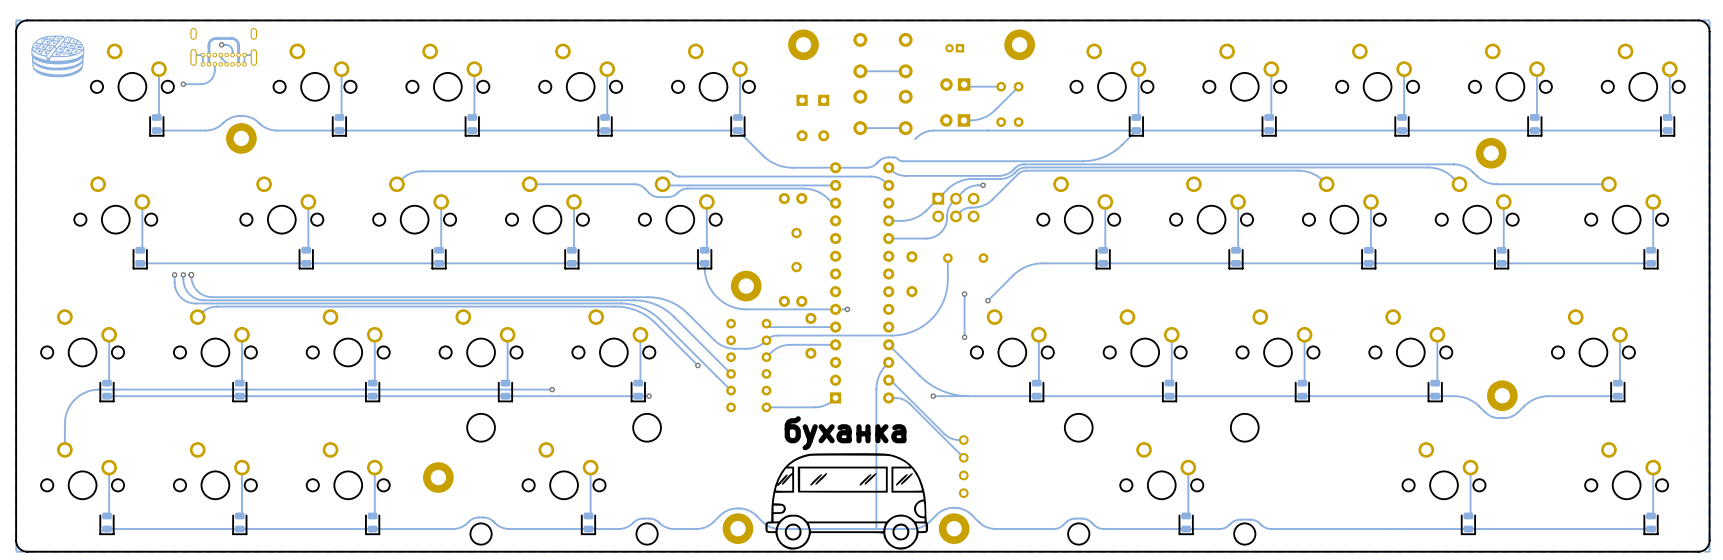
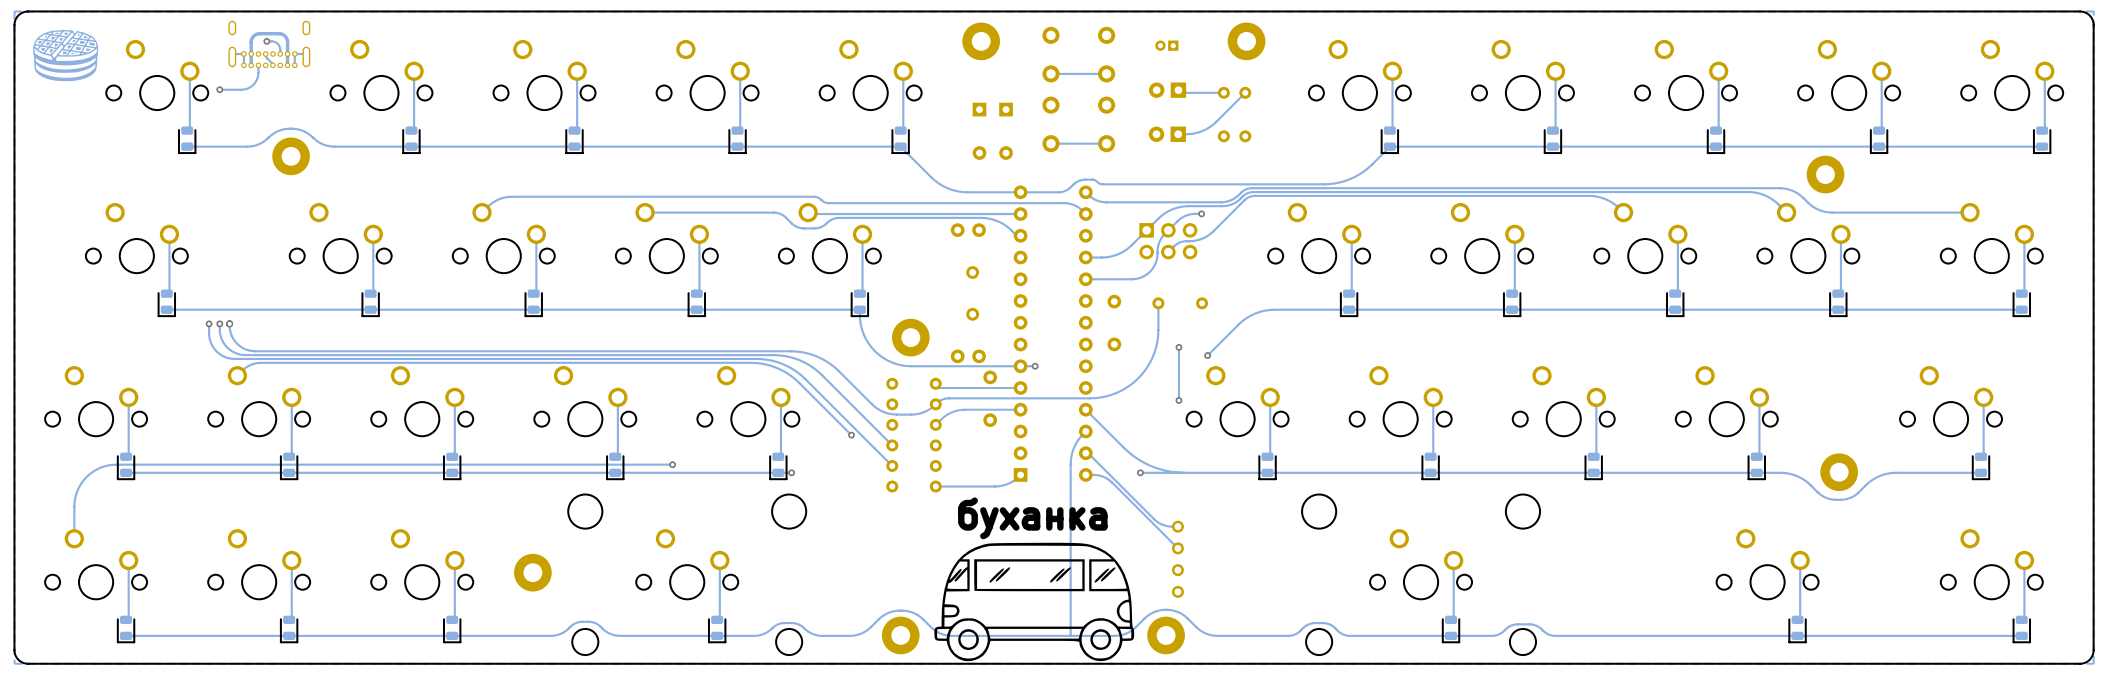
track: (1136, 130) (933, 130) (924, 132) (915, 139) -> none

